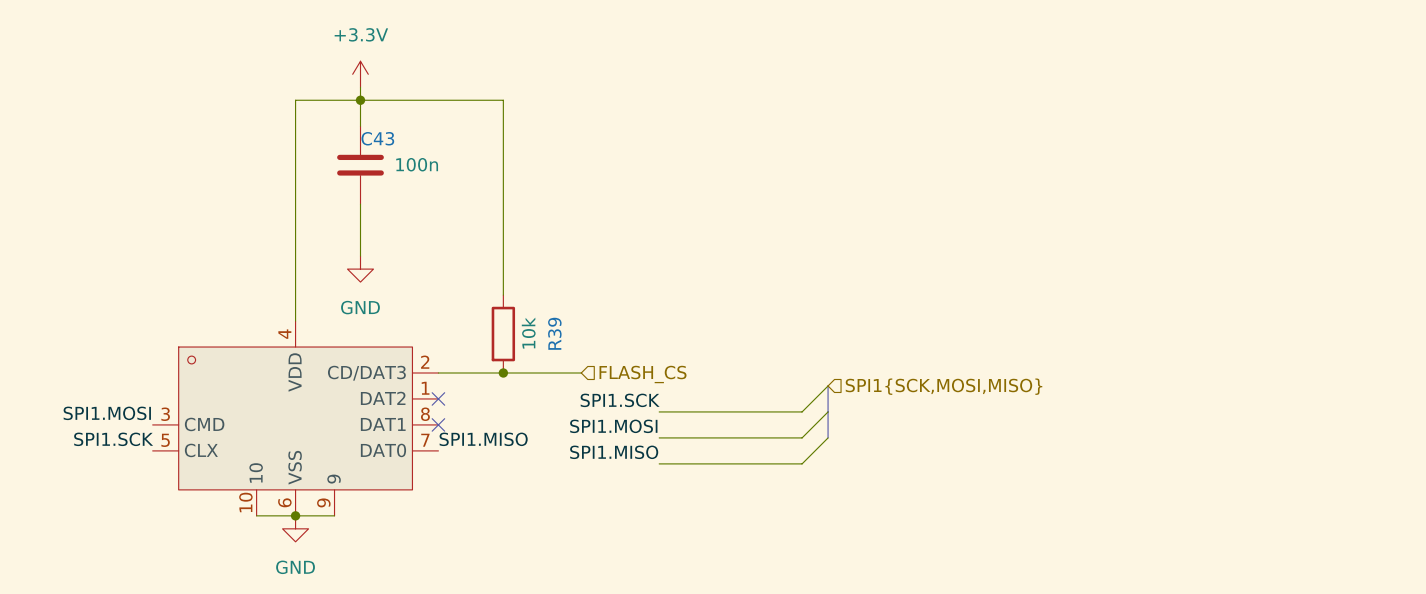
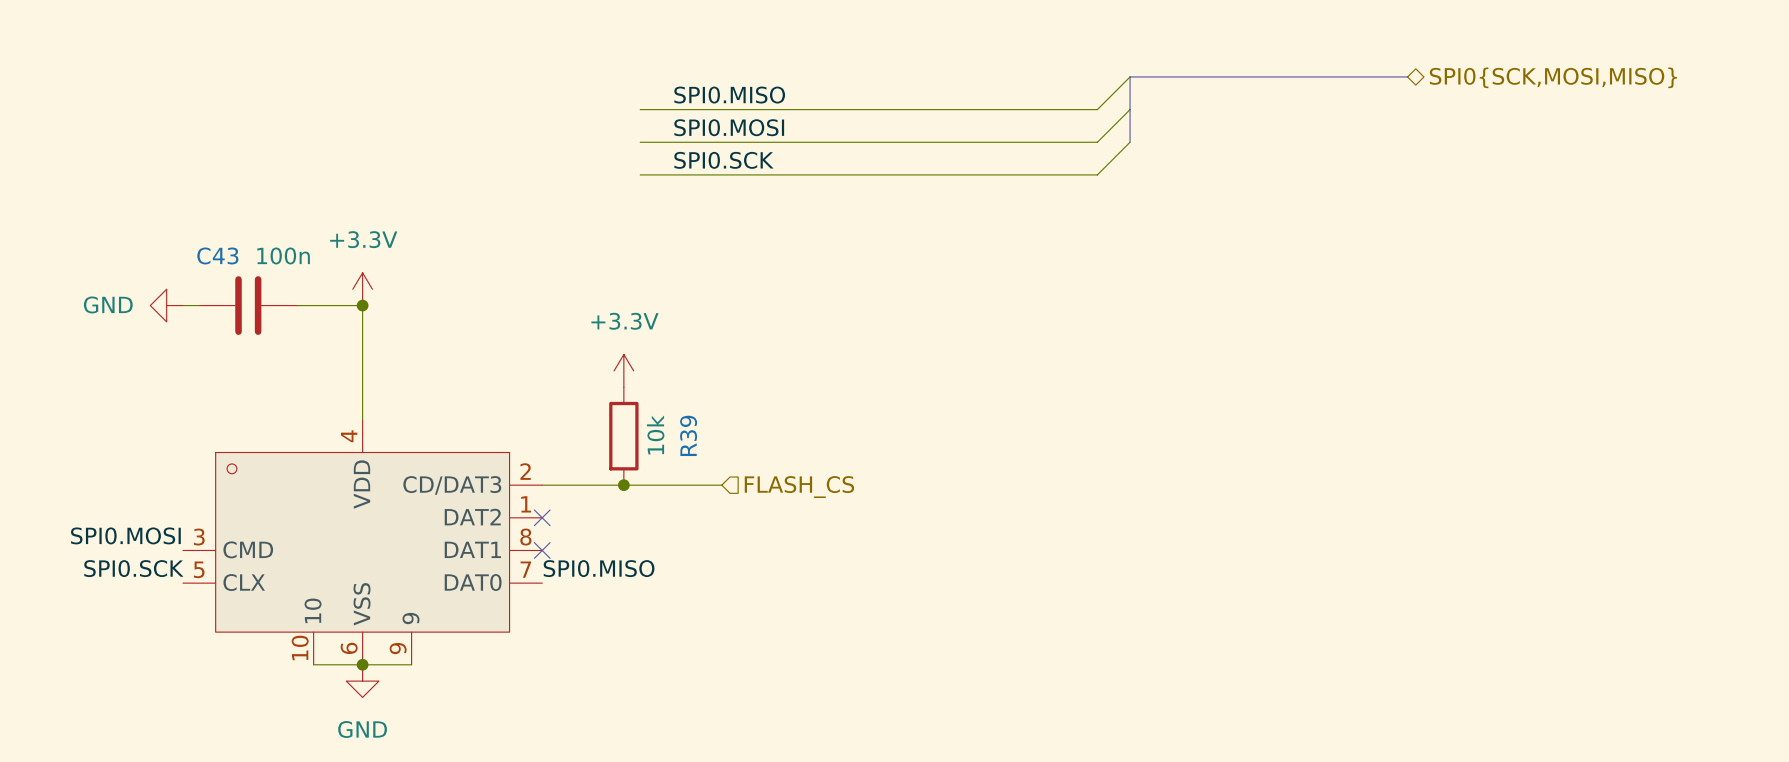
wire: none -> (1130, 76) (1097, 109) (640, 109)
bus: none -> (1407, 76) (1130, 76) (1130, 142)
hierarchical label: none -> SPI0{SCK,MOSI,MISO} (1553, 77)
label: none -> SPI0.MISO (729, 95)
power symbol: +3.3V (360, 74) -> none
wire: none -> (1130, 109) (1097, 142) (640, 142)
wire: (360, 87) (360, 126) -> none
label: none -> SPI0.MOSI (729, 127)
junction: (360, 100) -> none
wire: none -> (1130, 142) (1097, 174) (640, 174)
label: none -> SPI0.SCK (723, 160)
C43 name position: C43 (377, 138) -> C43 (217, 255)
C43 value position: 100n (417, 164) -> 100n (283, 255)
C43 rotation: 0° (360, 165) -> 90° clockwise (248, 305)
C43 position: (360, 165) -> (248, 305)
wire: (360, 204) (360, 256) -> none
power symbol: none -> +3.3V (362, 289)
wire: none -> (182, 305) (199, 305)
wire: (295, 230) (295, 100) (503, 100) (503, 295) -> (362, 305) (297, 305)
junction: none -> (362, 305)
power symbol rotation: 0° (360, 269) -> 90° clockwise (166, 305)
power symbol position: GND (360, 269) -> GND (166, 305)
power symbol: none -> +3.3V (623, 370)
wire: (828, 385) (802, 411) (659, 411) -> none
bus: (828, 385) (828, 437) -> none
hierarchical label: SPI1{SCK,MOSI,MISO} (943, 386) -> none
label: SPI1.SCK (620, 400) -> none
wire: (828, 411) (802, 437) (659, 437) -> none
label: SPI1.MOSI (107, 413) -> SPI0.MOSI (125, 535)
label: SPI1.MOSI (613, 426) -> none
wire: (828, 437) (802, 463) (659, 463) -> none
label: SPI1.SCK (113, 439) -> SPI0.SCK (133, 568)
label: SPI1.MISO (483, 439) -> SPI0.MISO (599, 568)
label: SPI1.MISO (614, 452) -> none

